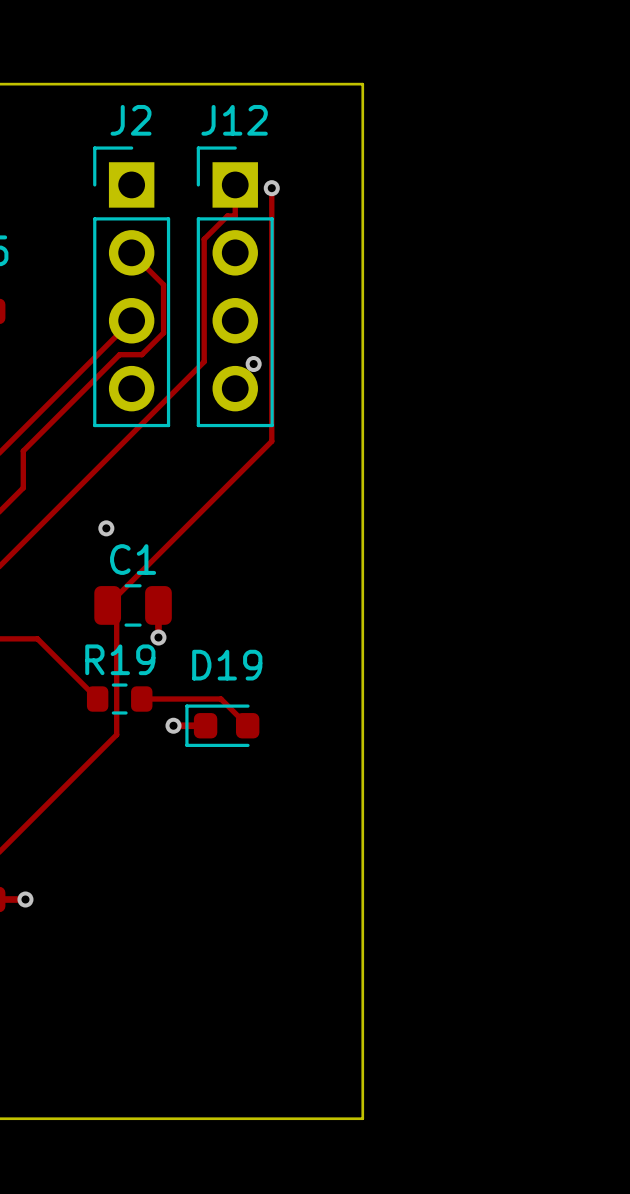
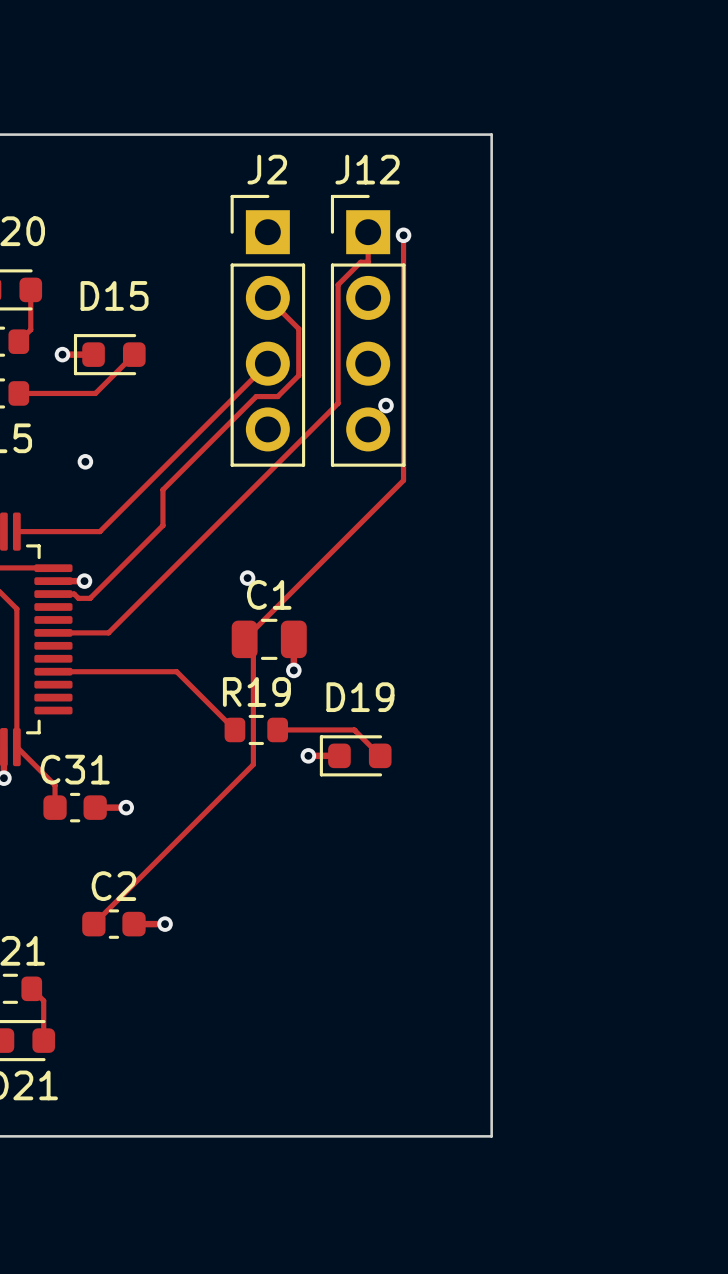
via position: (106, 528) -> (247, 578)

